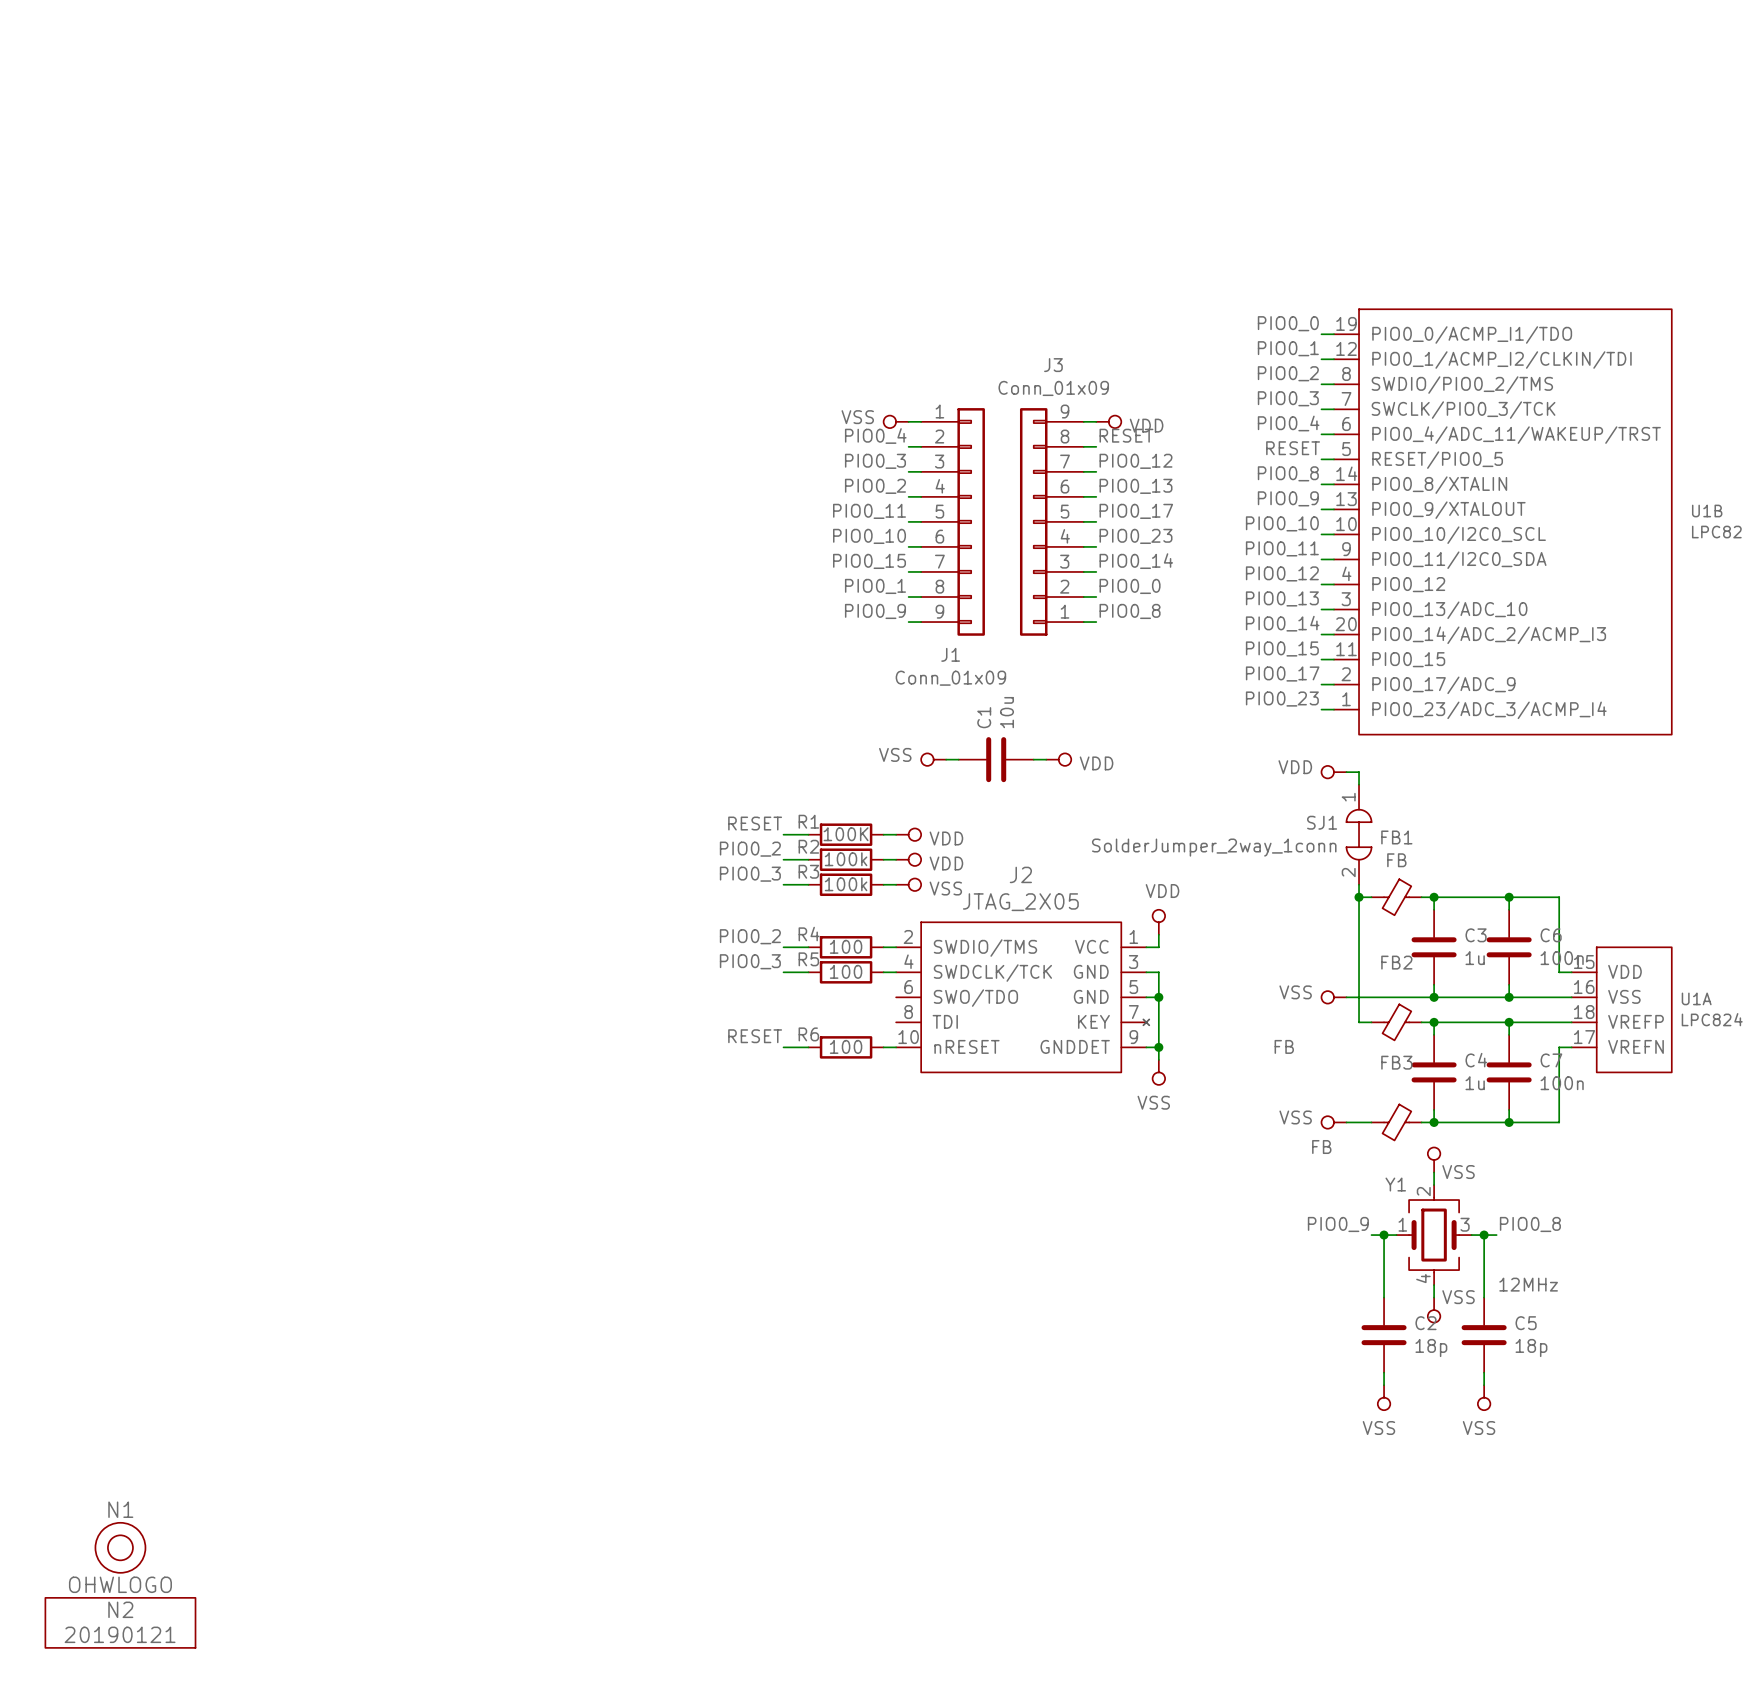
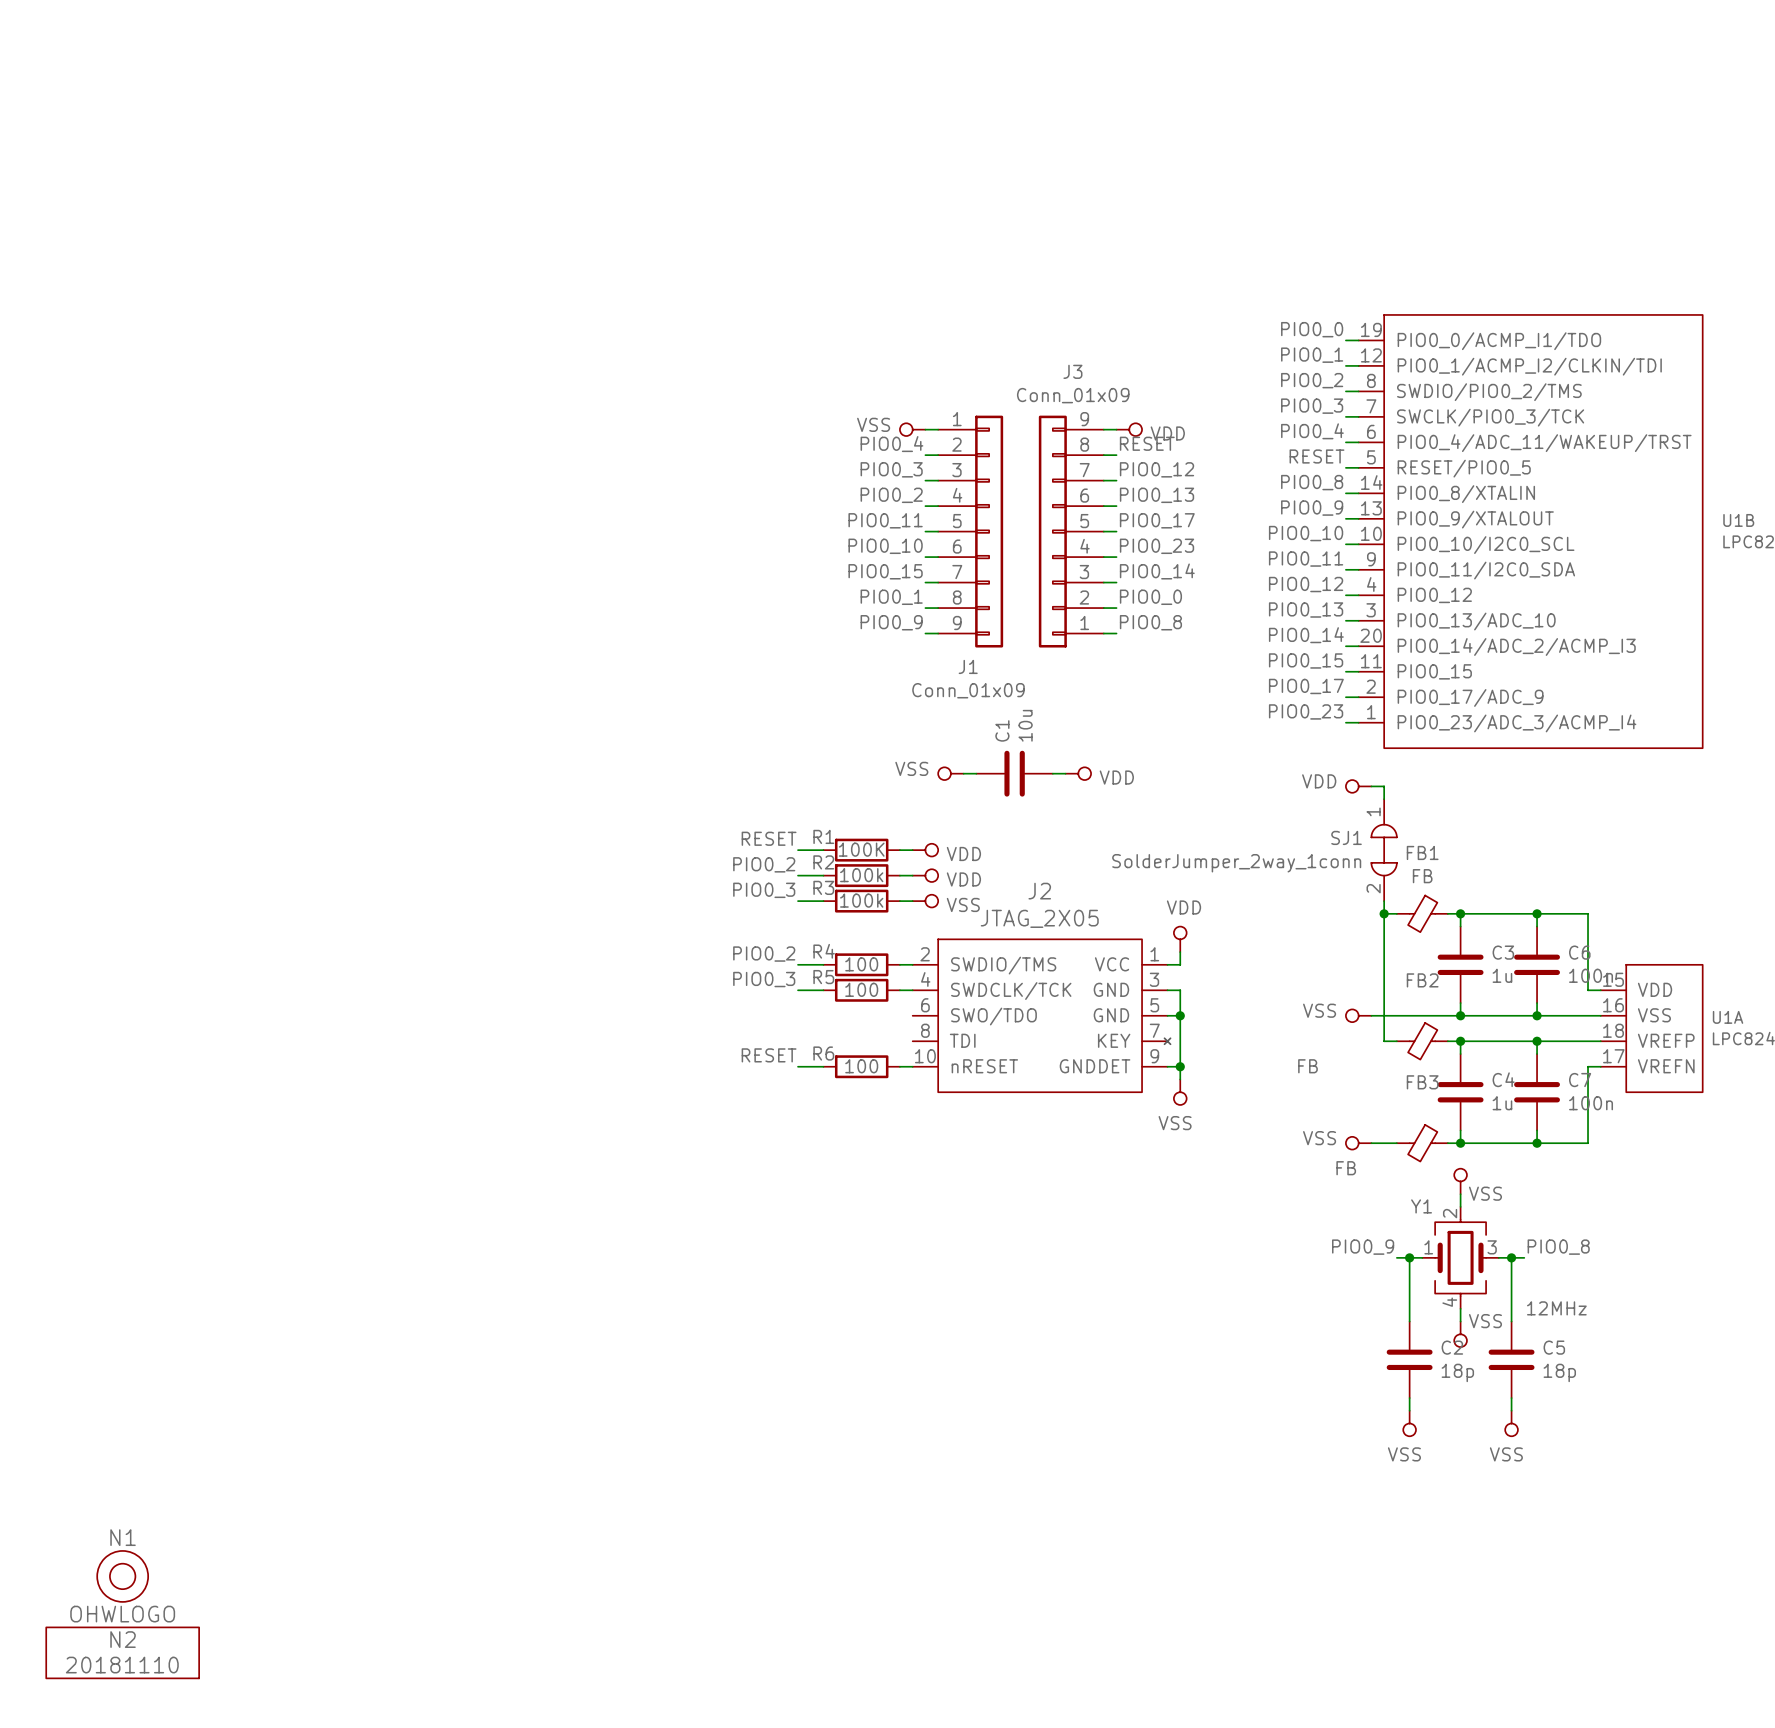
N2 value: 20190121 (120, 1634) -> 20181110 (122, 1665)

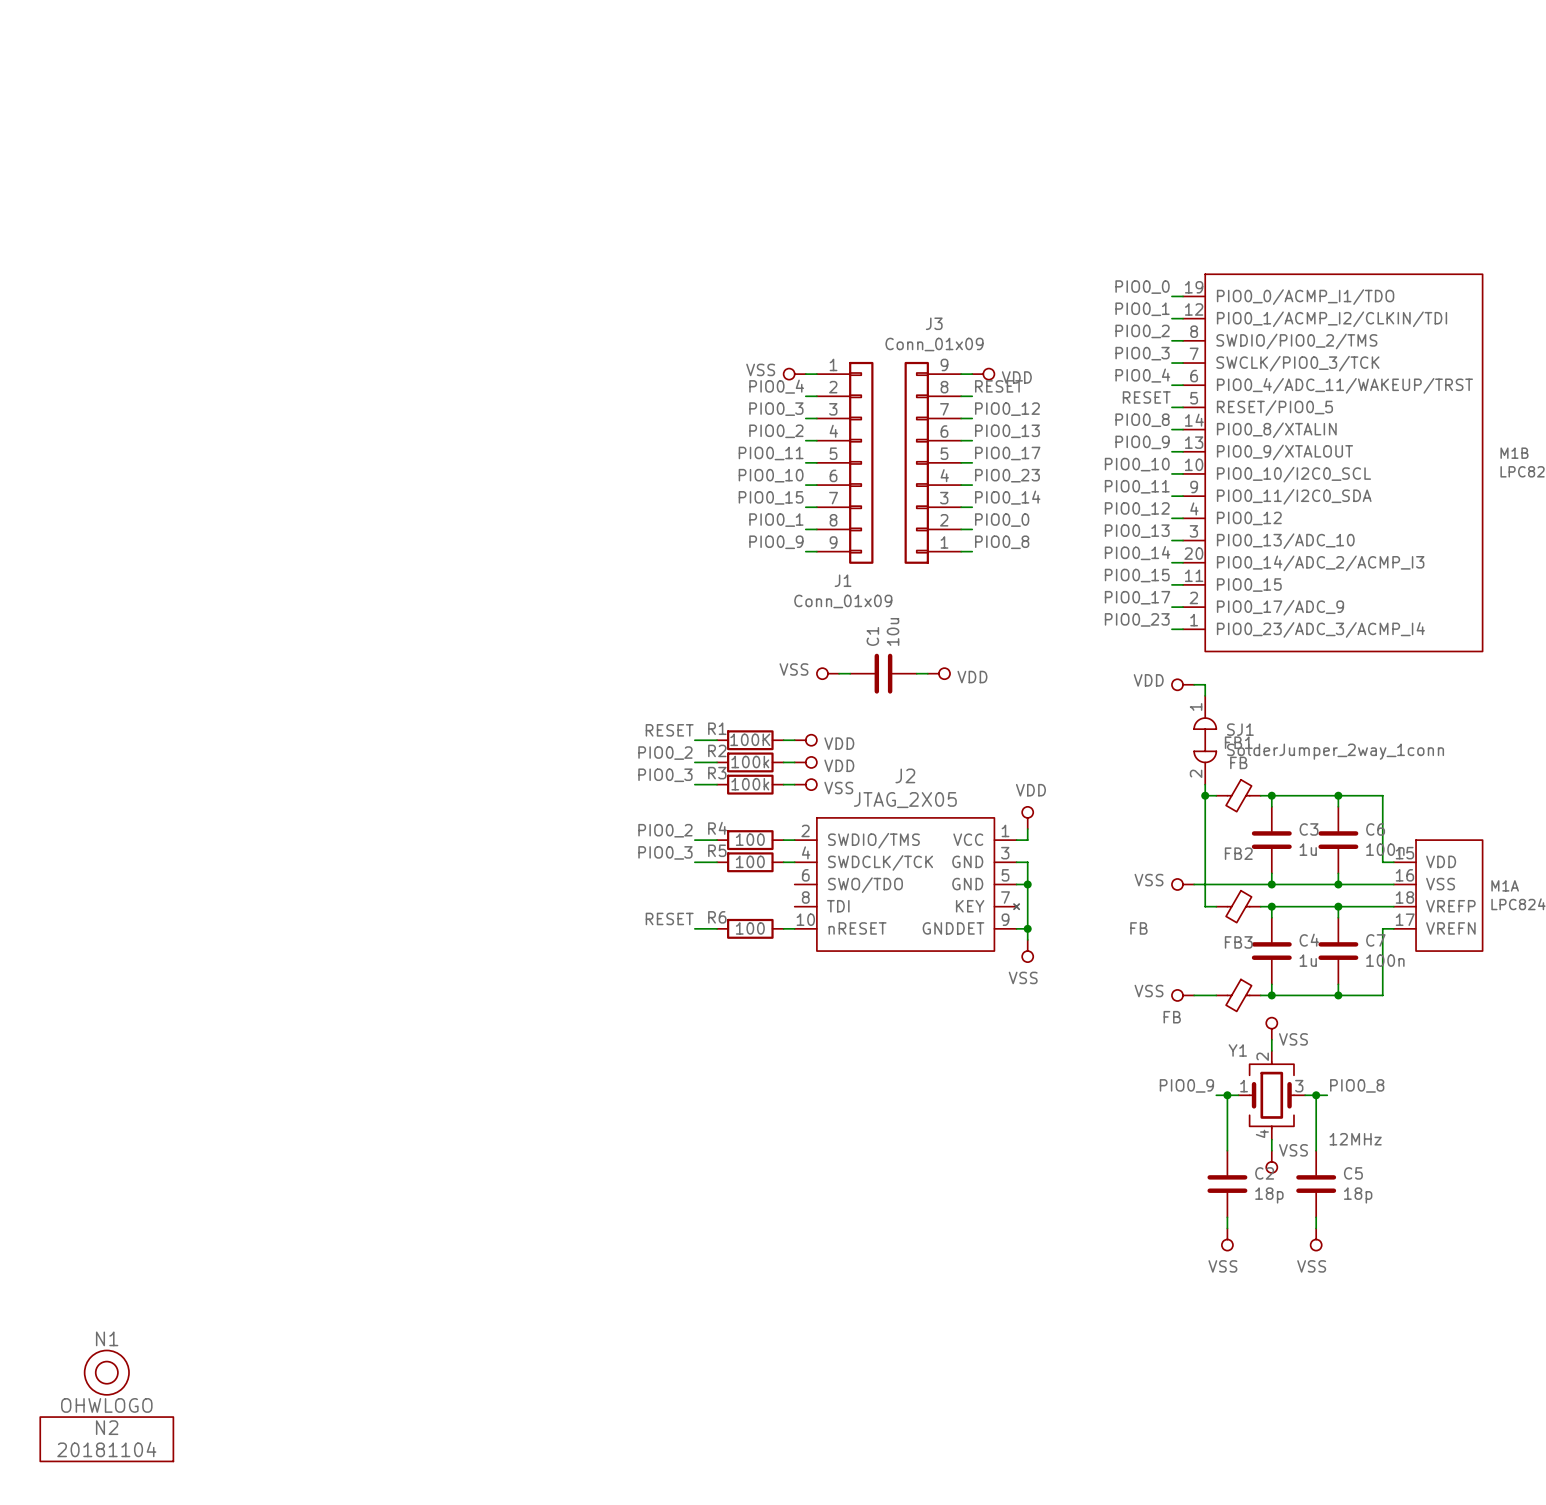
U1B name: U1B (1738, 520) -> M1B (1514, 453)
SJ1 name position: SJ1 (1346, 837) -> SJ1 (1240, 729)
SJ1 value position: SolderJumper_2way_1conn (1236, 863) -> SolderJumper_2way_1conn (1335, 751)
U1A name: U1A (1728, 1017) -> M1A (1505, 885)
N2 value: 20181110 (122, 1665) -> 20181104 (106, 1449)

